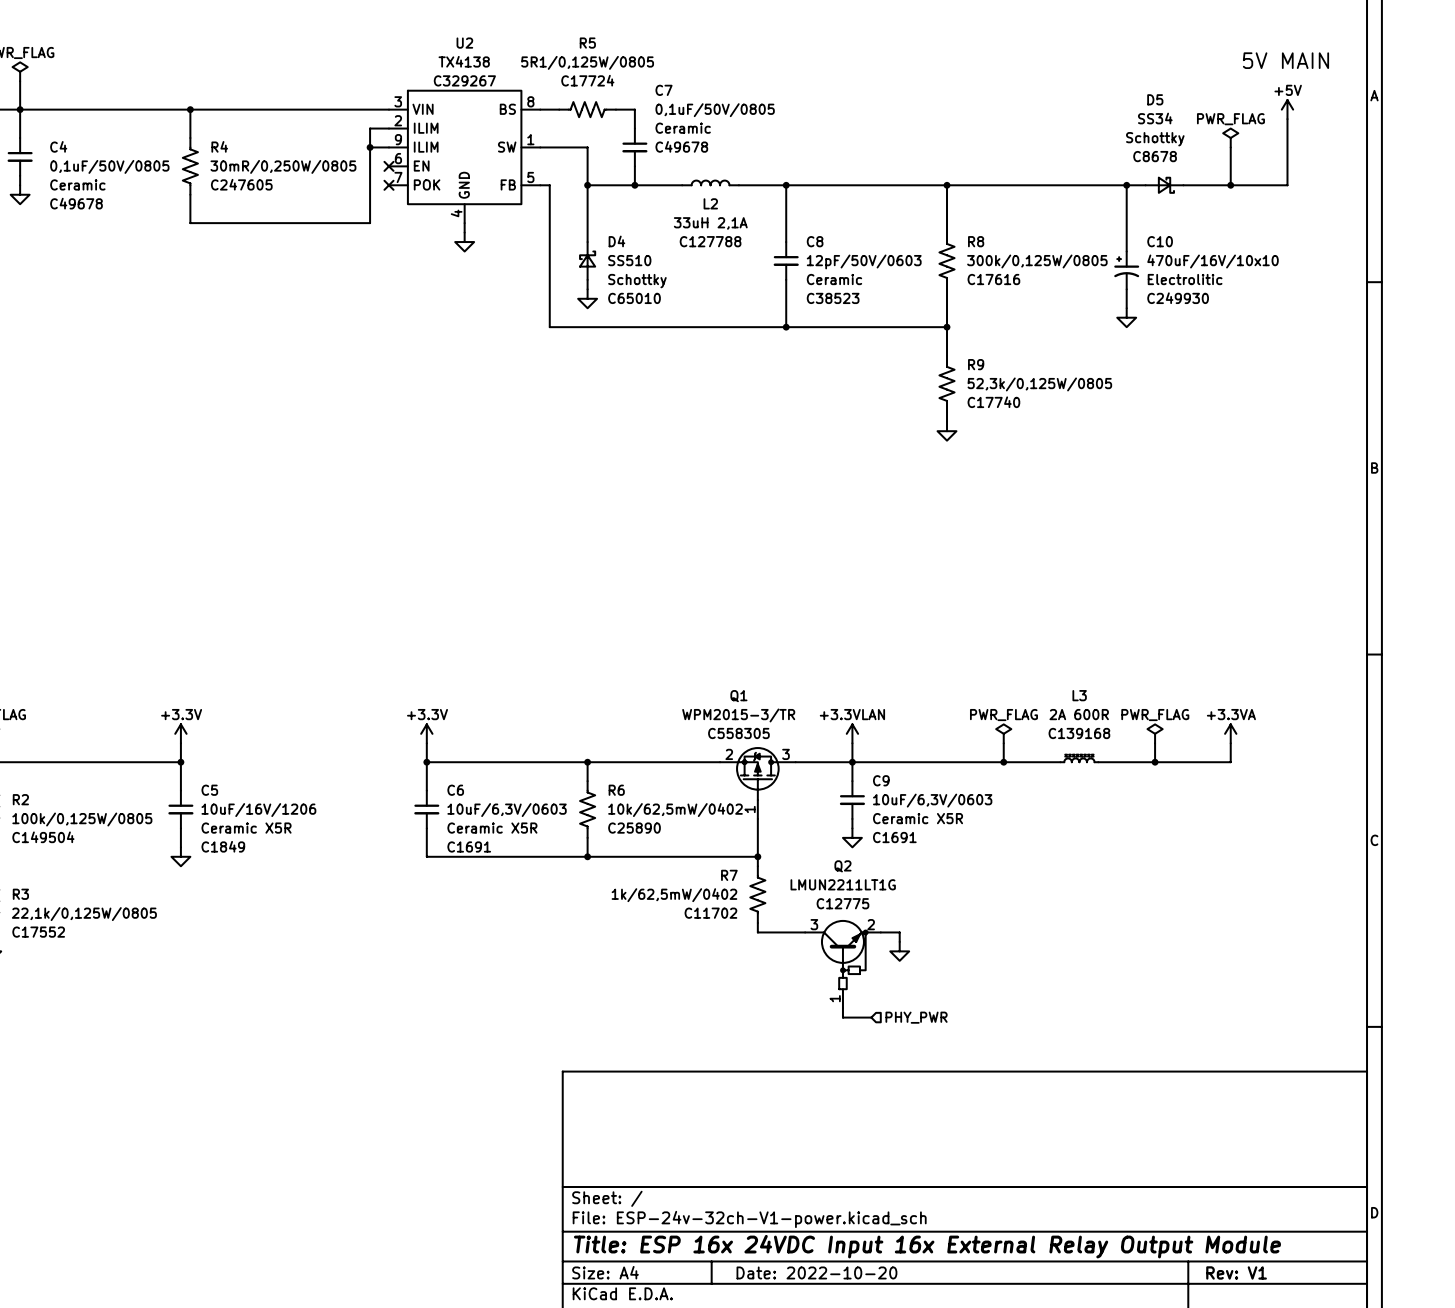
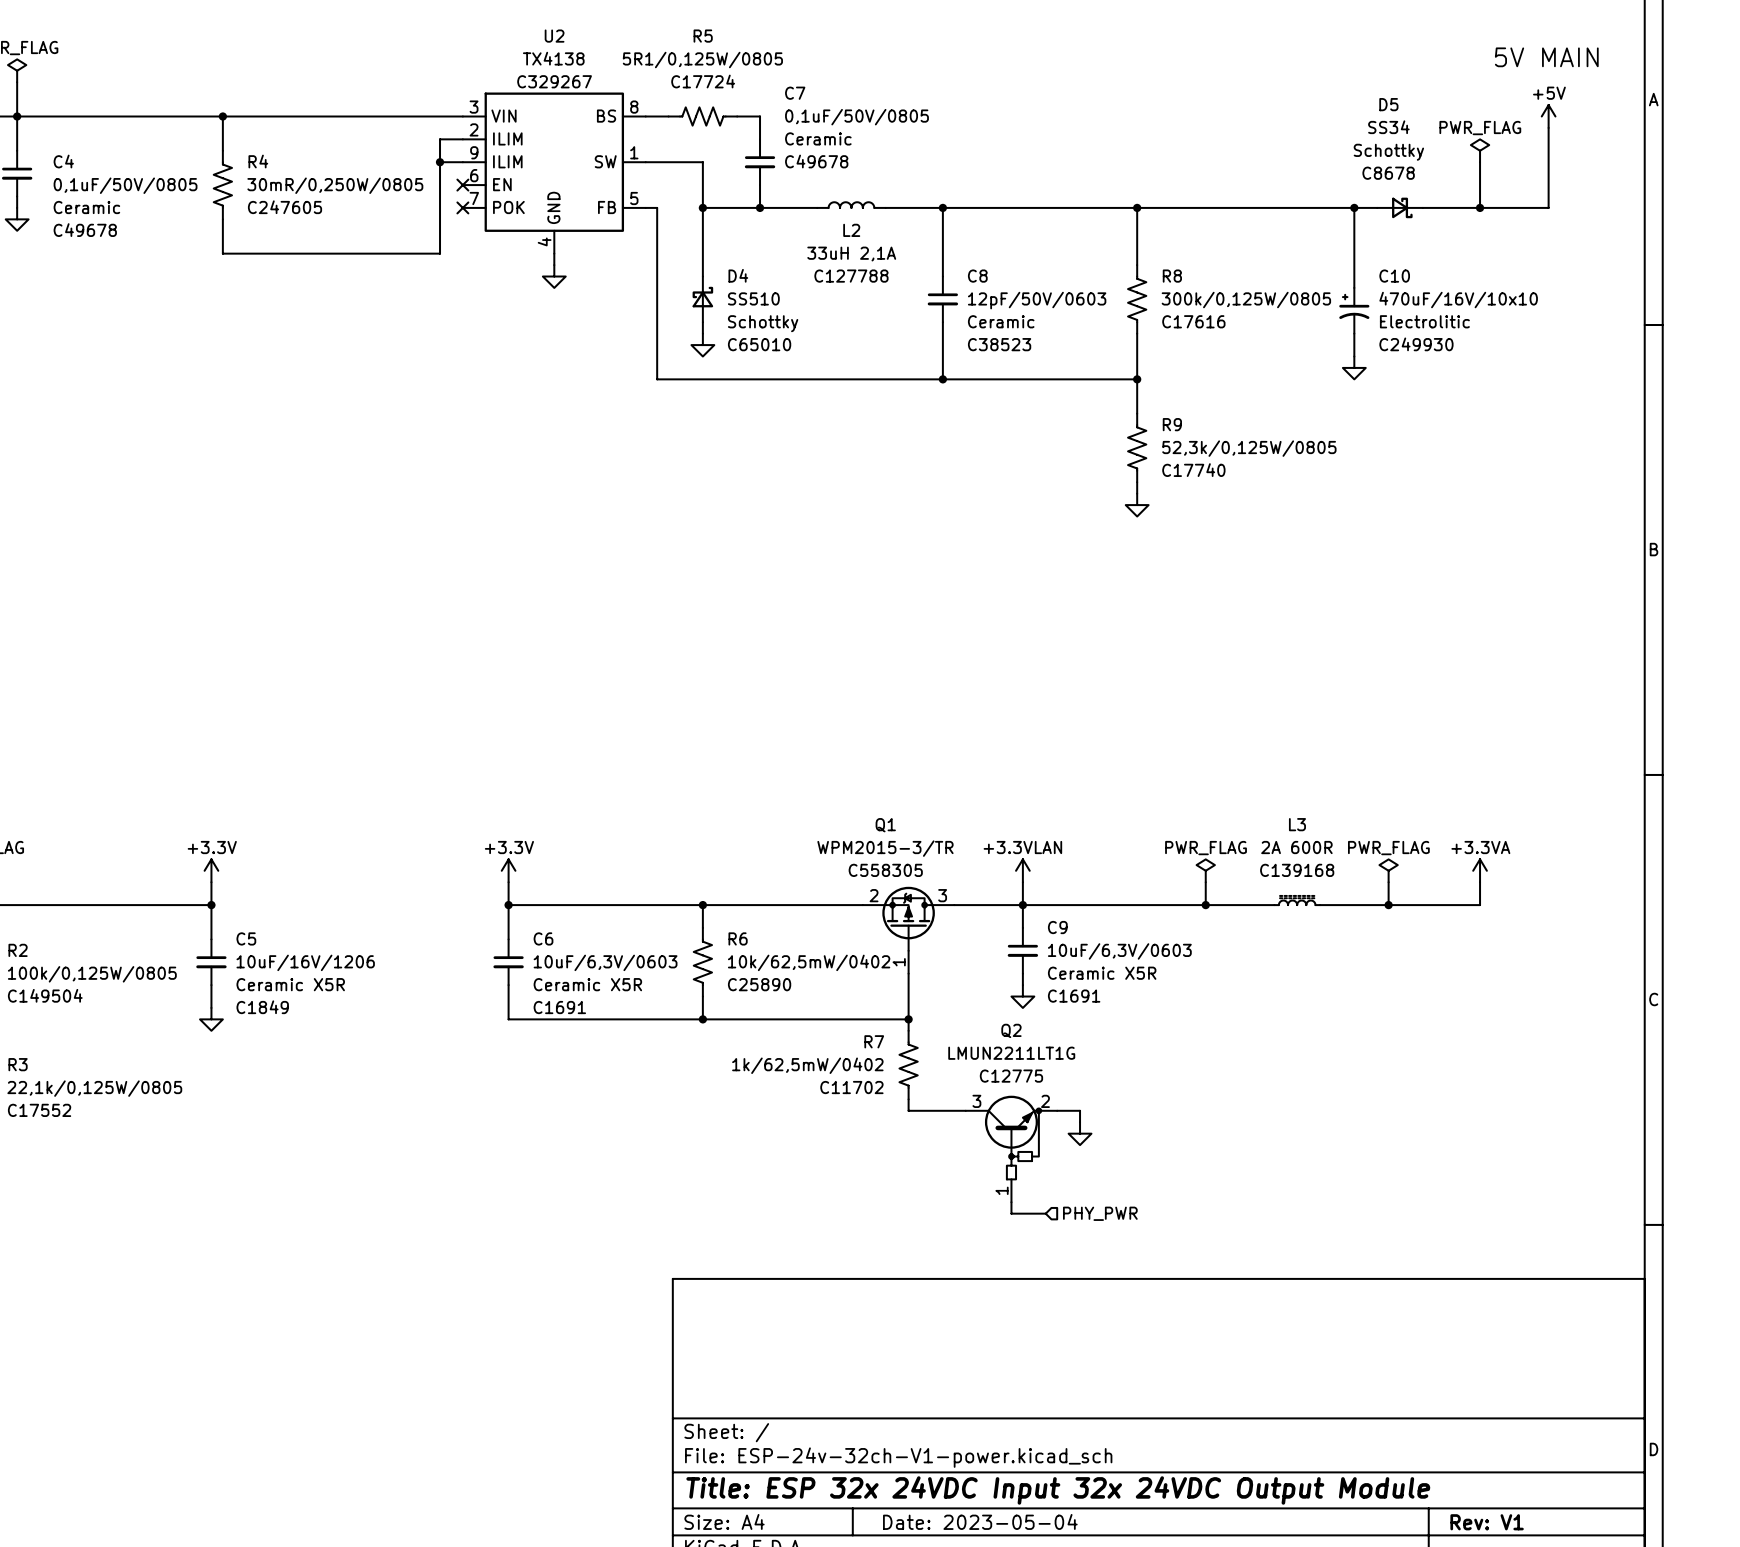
title block: Title: ESP 16x 24VDC Input 16x External Relay Output Module (927, 1246) -> Title: ESP 32x 24VDC Input 32x 24VDC Output Module (1058, 1490)
title block: Date: 2022-10-20 (816, 1272) -> Date: 2023-05-04 (980, 1521)

